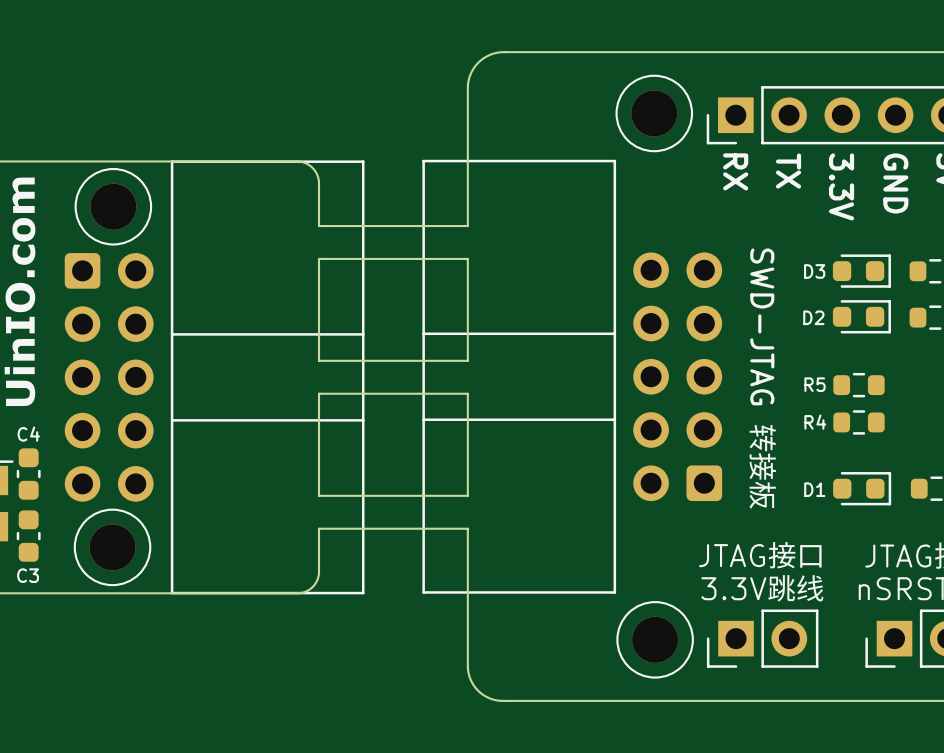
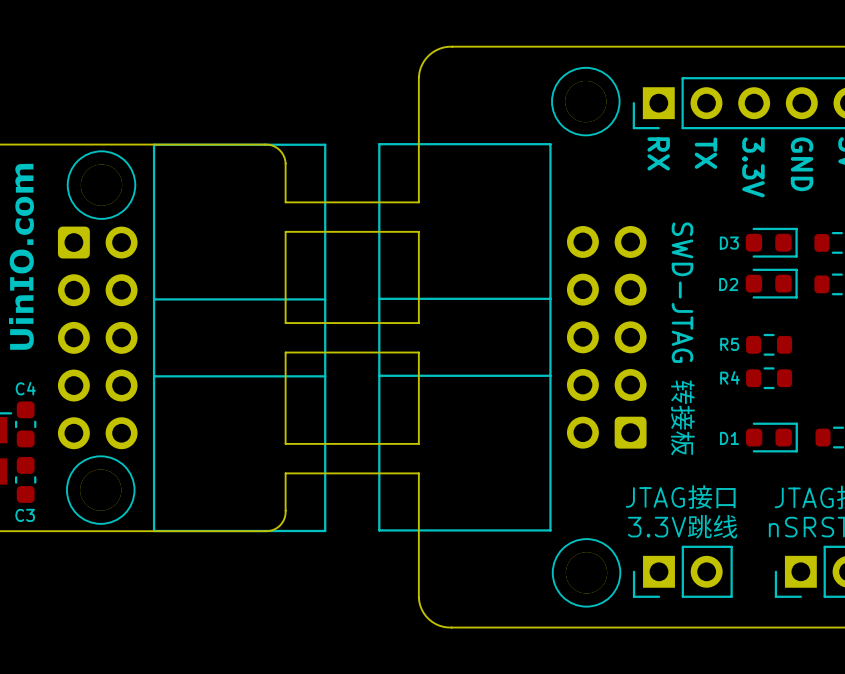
drawing shape: [4, 177, 36, 407] -> [8, 163, 34, 350]

